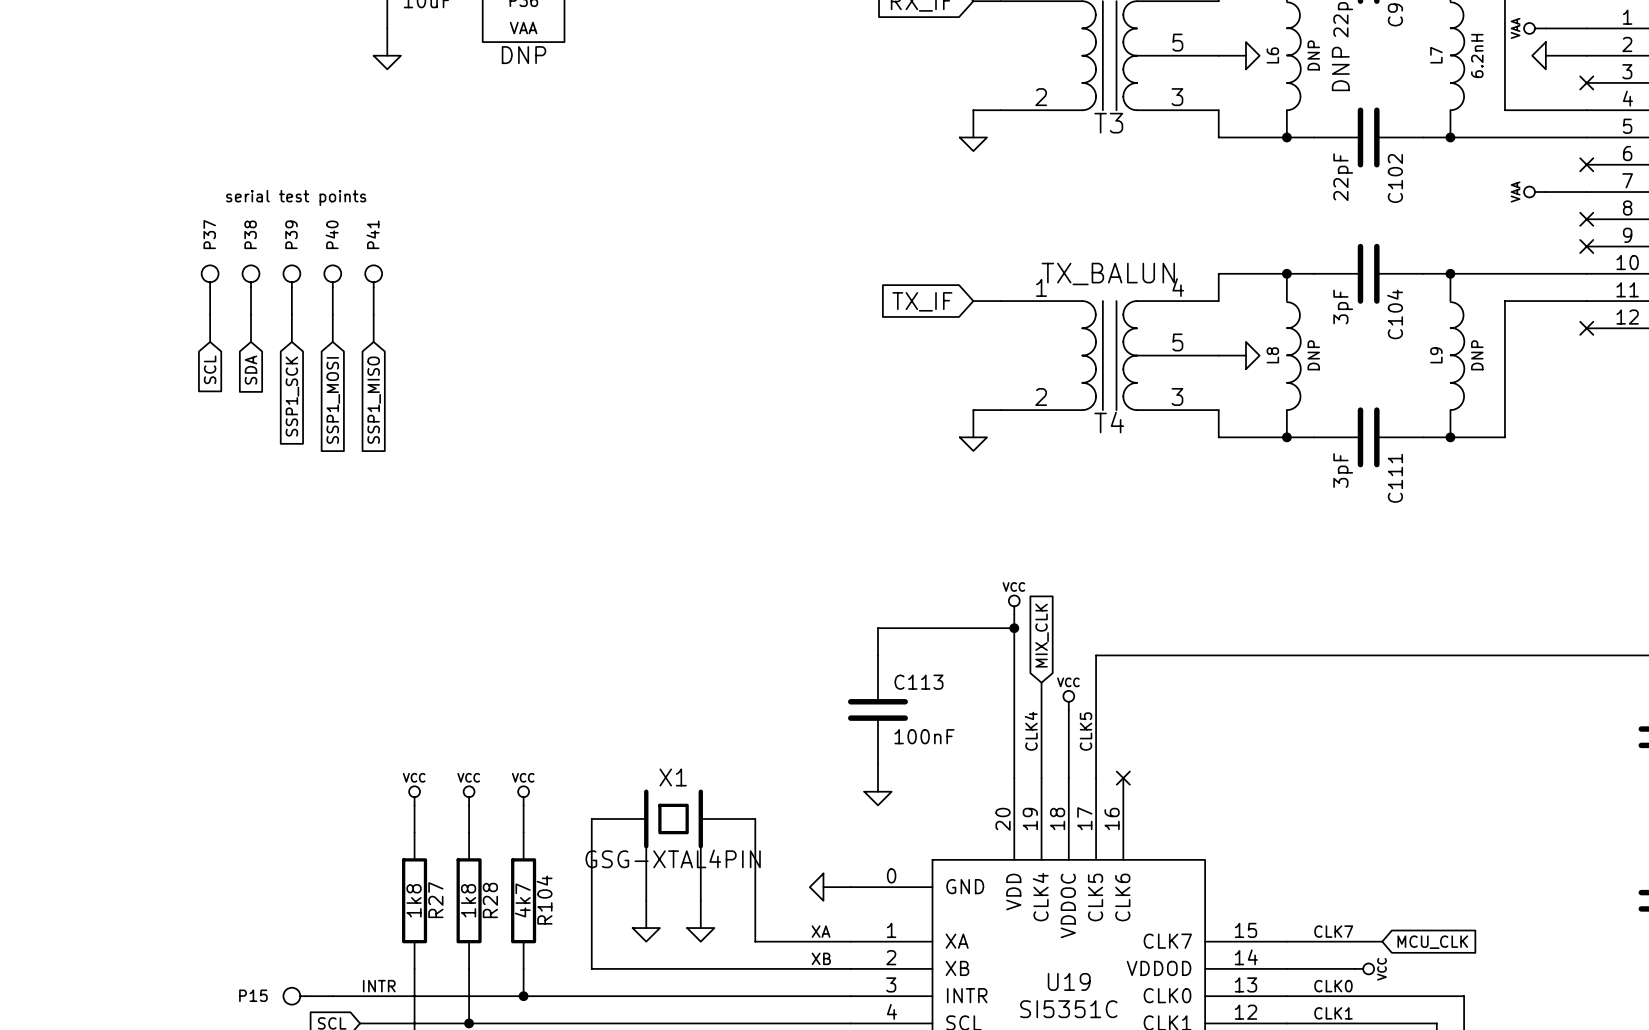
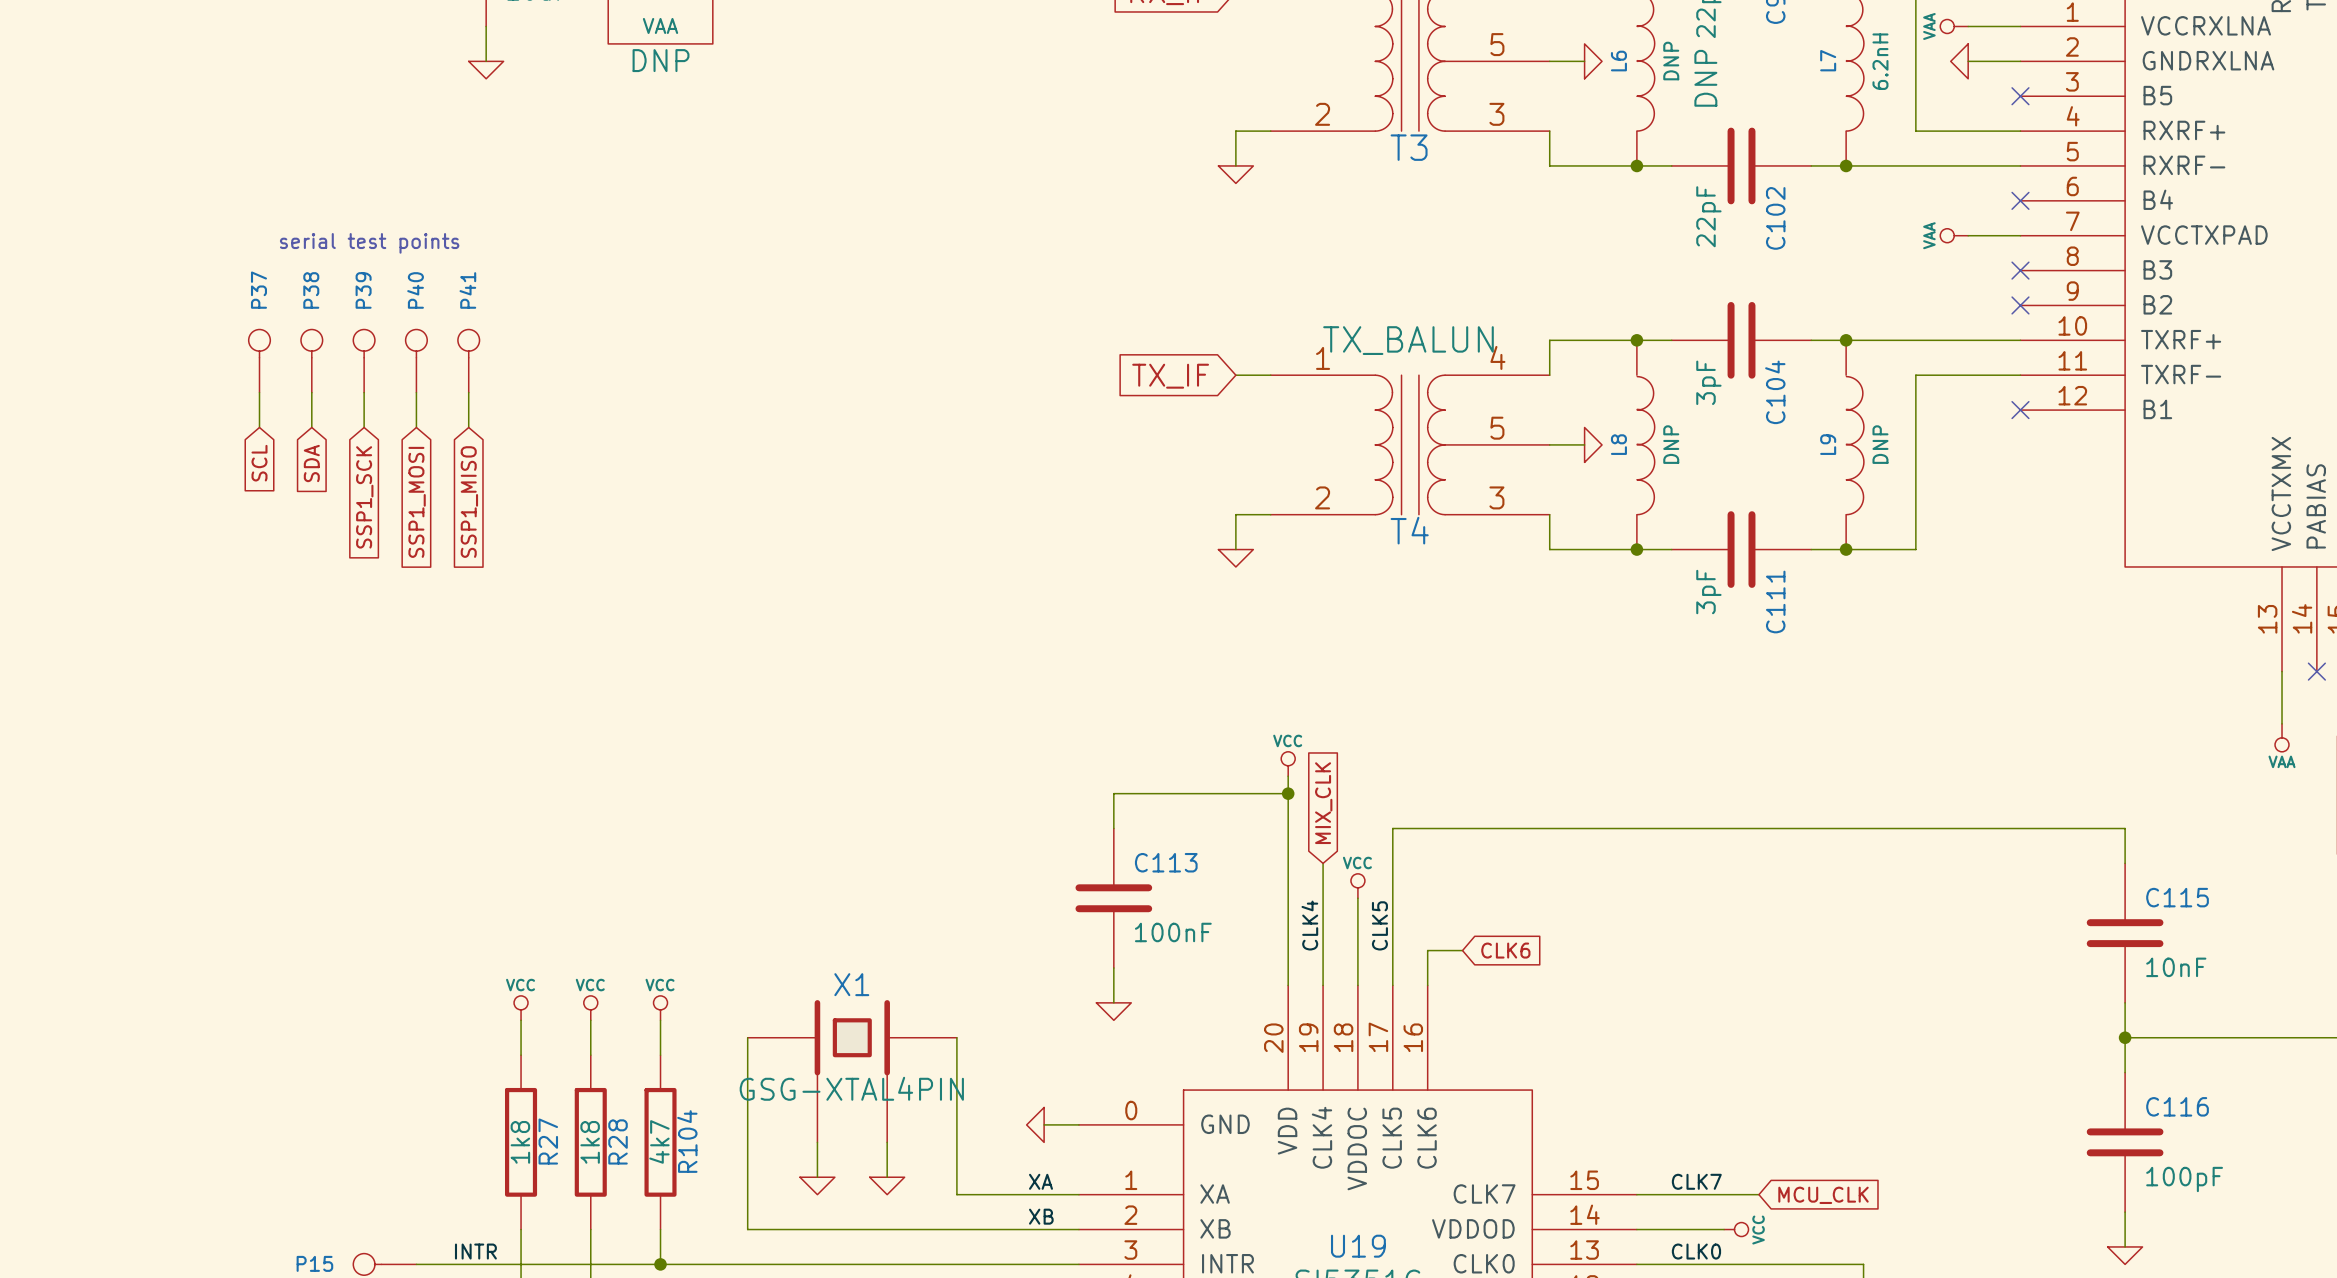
wire: none -> (1462, 950) (1427, 950) (1427, 985)
global label: none -> CLK6 (1505, 950)
no-connect mark: (1123, 778) -> none

